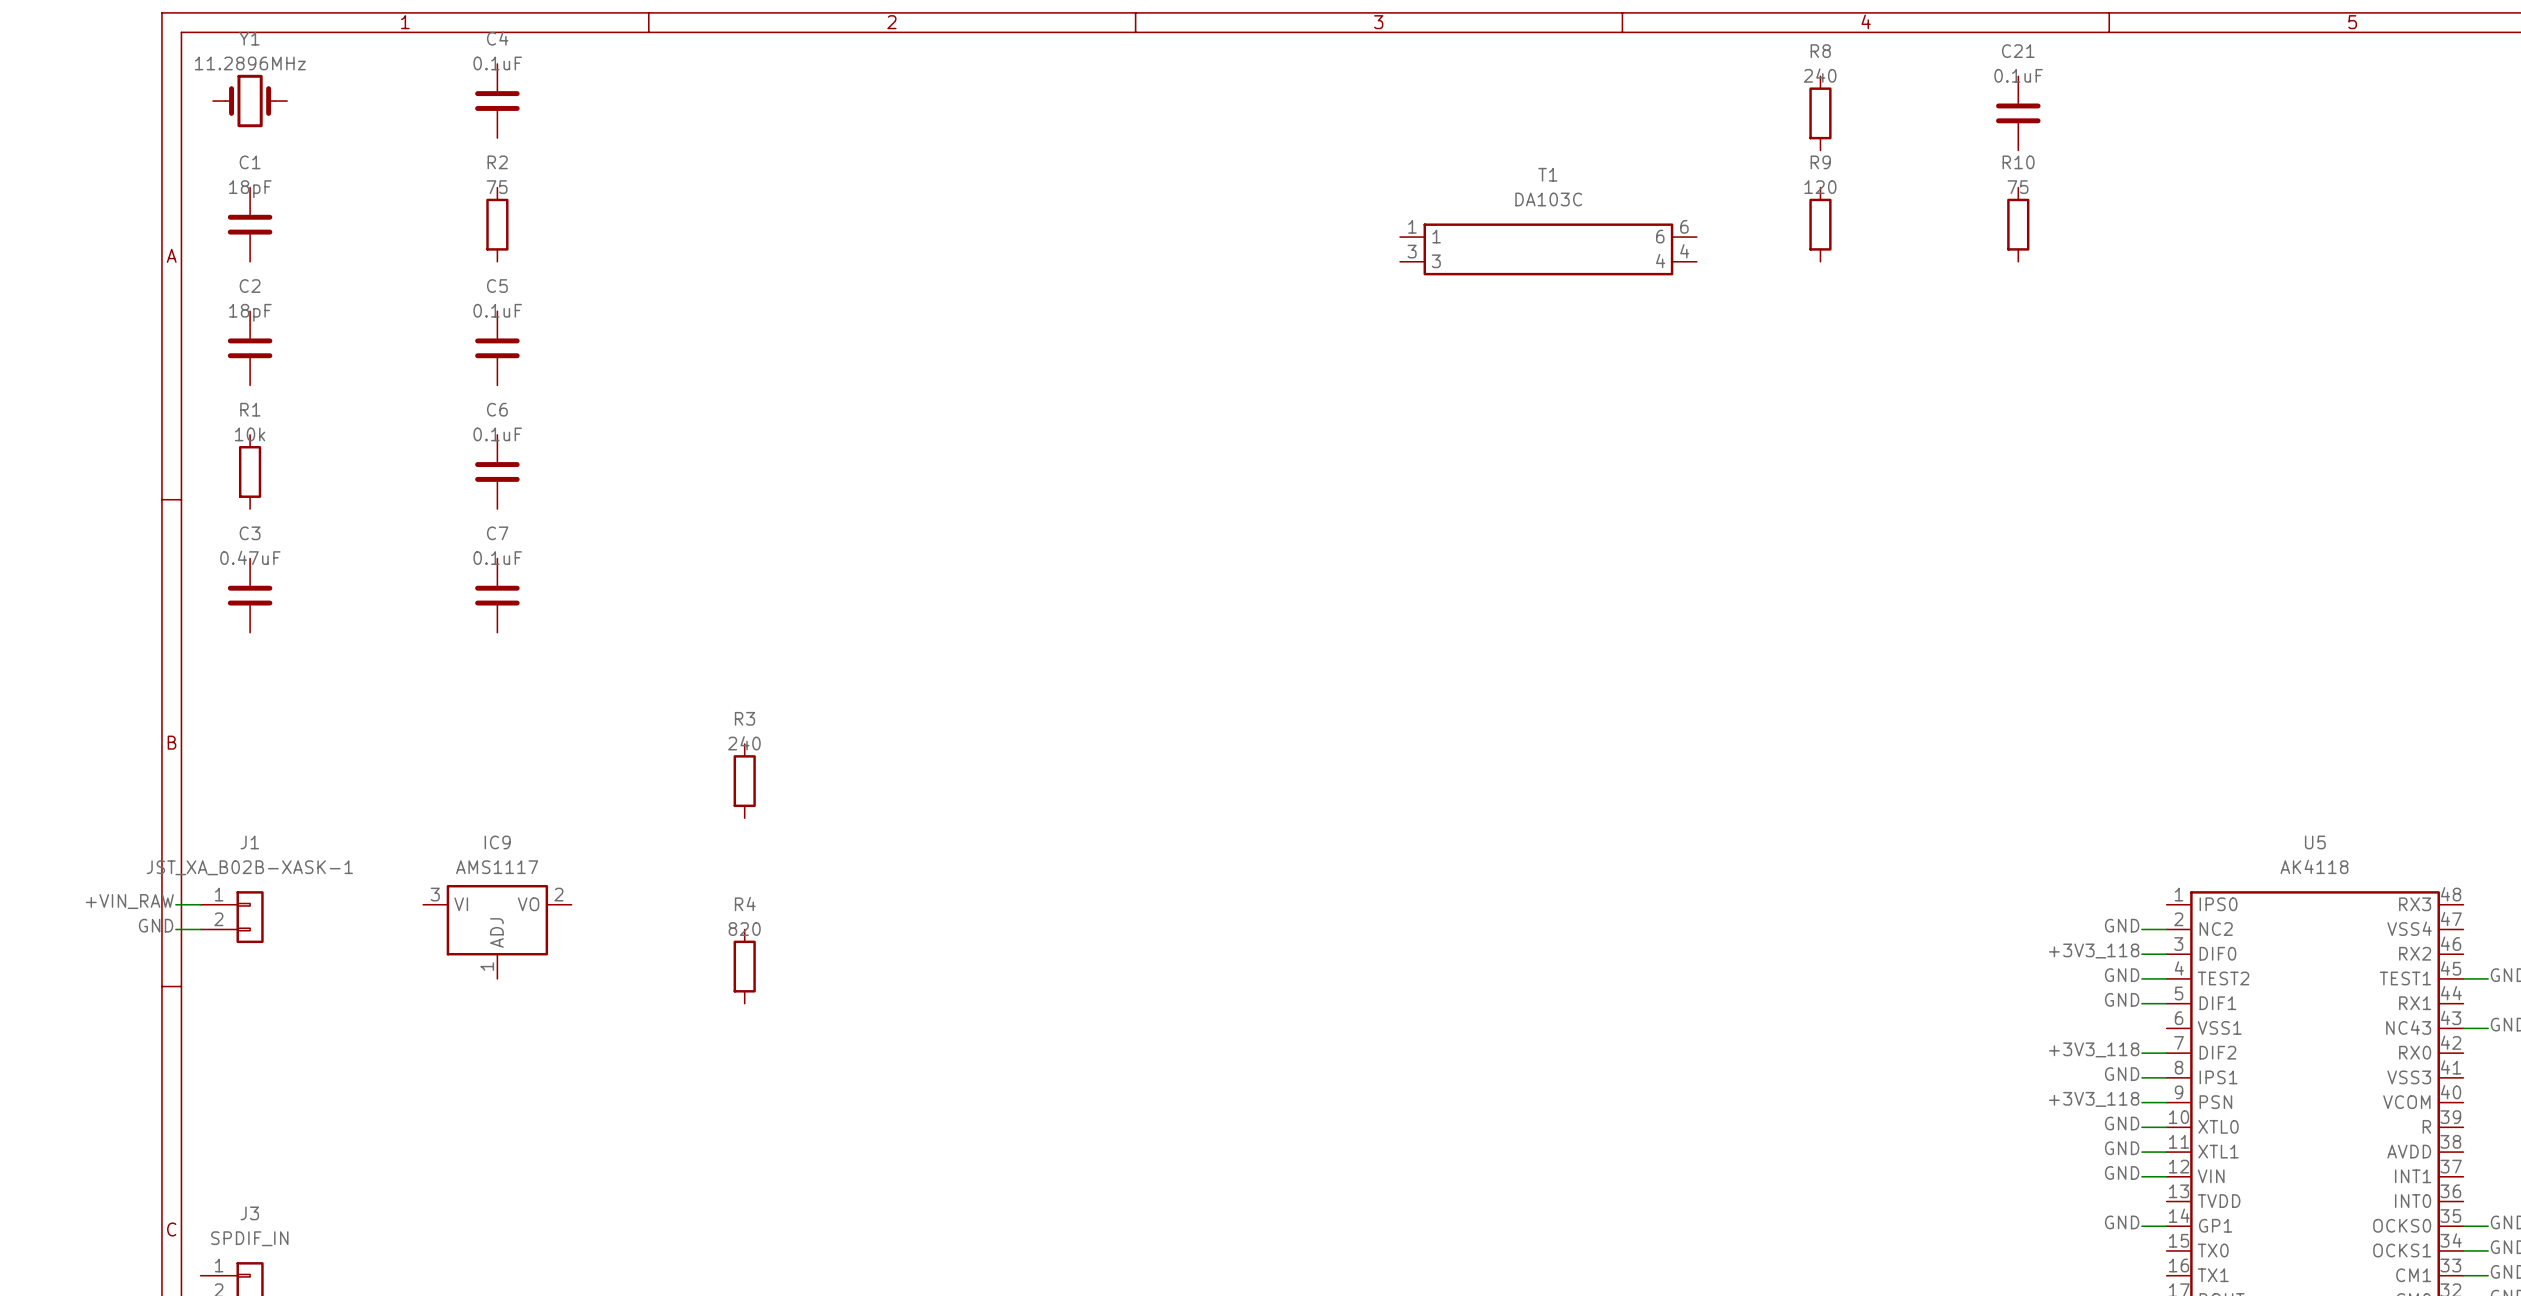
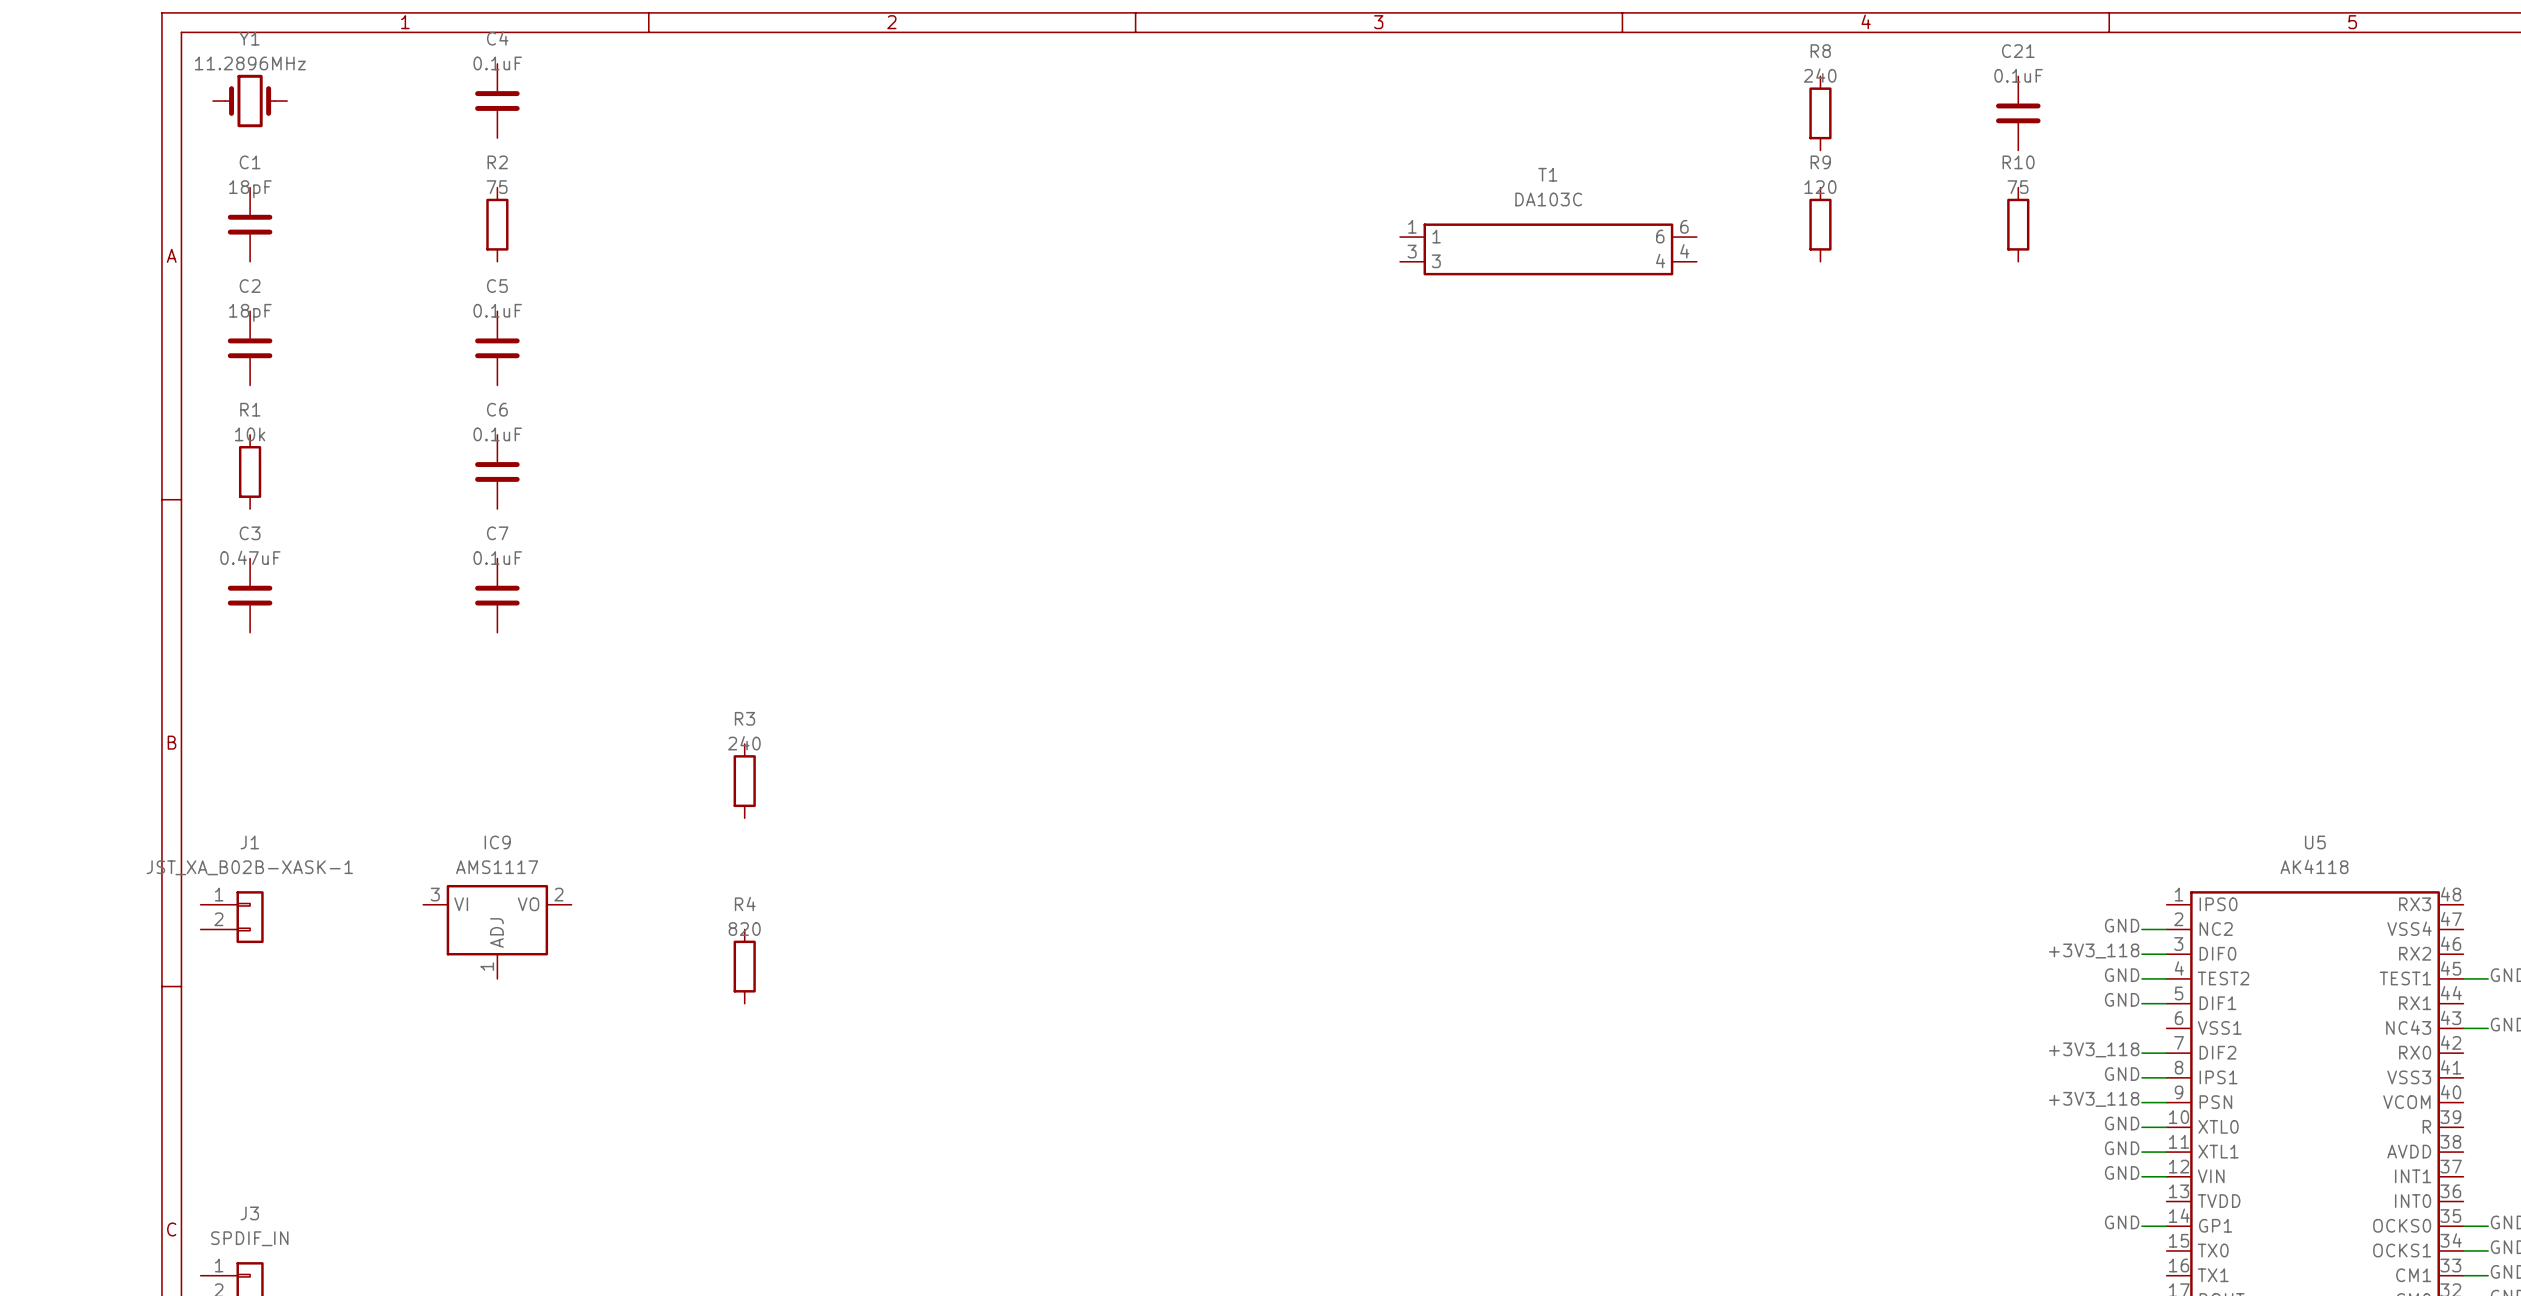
label: +VIN_RAW (129, 901) -> none
wire: (175, 904) (200, 904) -> none
label: GND (156, 925) -> none
wire: (175, 929) (200, 929) -> none

